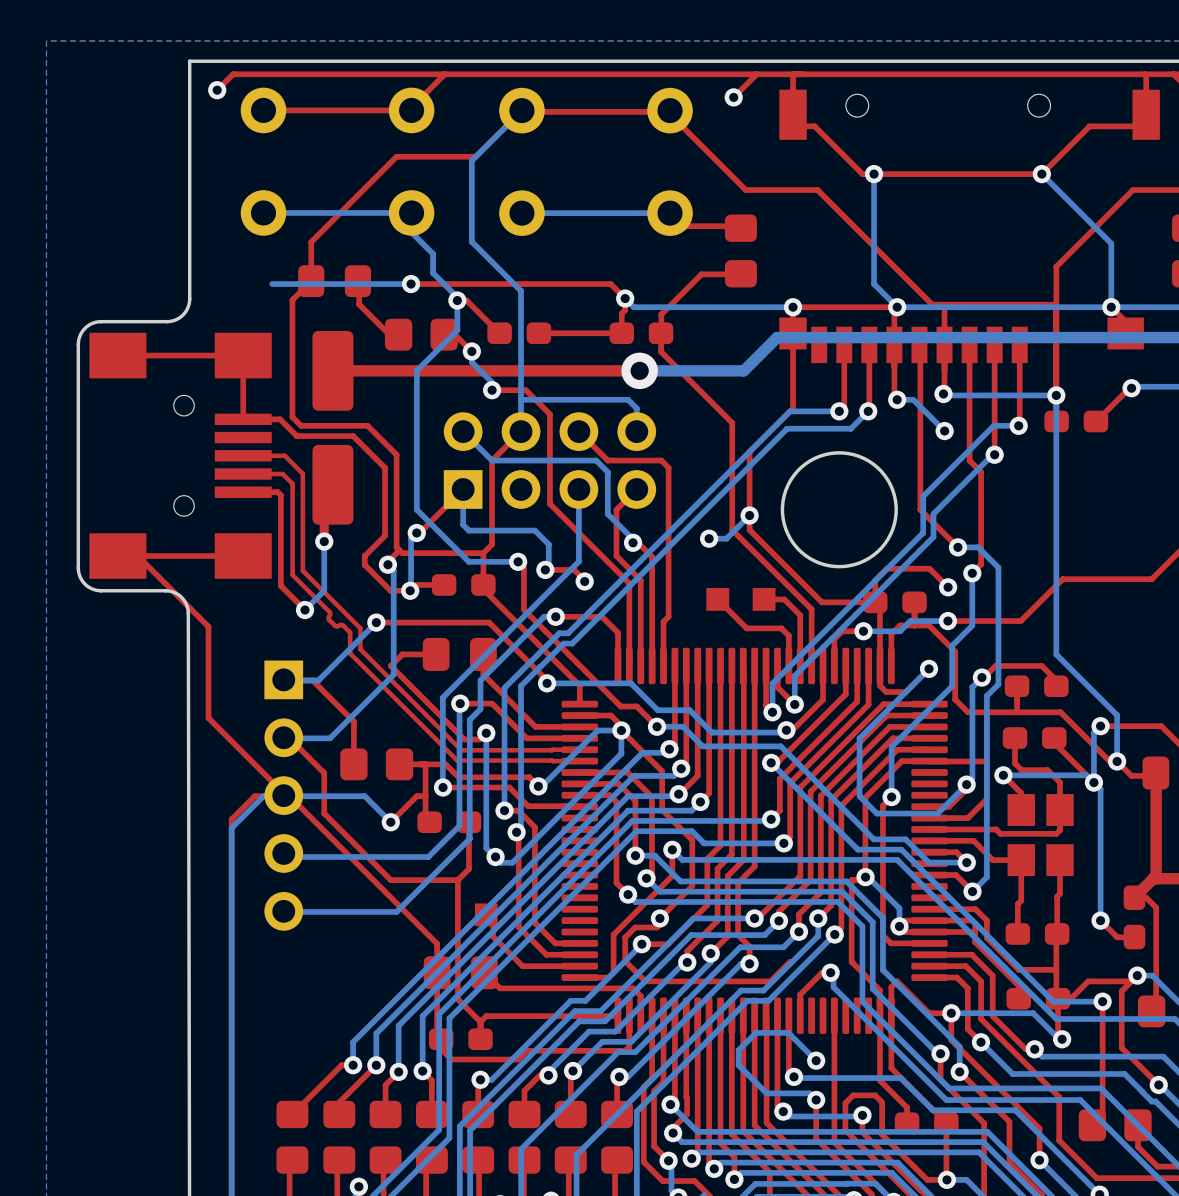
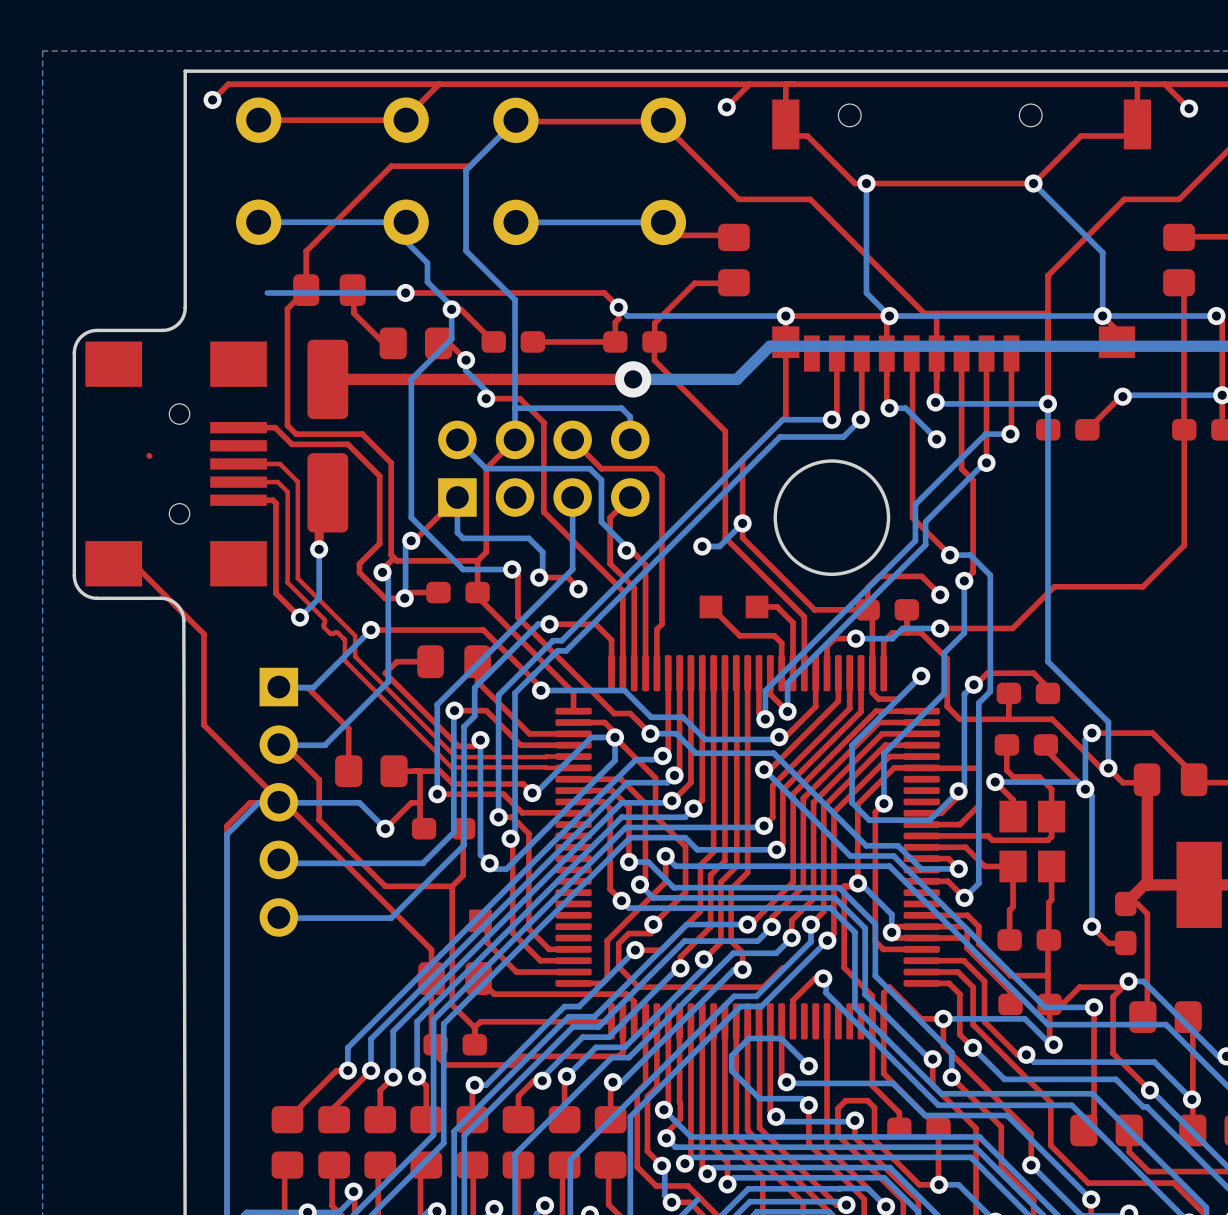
top track: (117, 355) (243, 355) (243, 419) -> none
top track: none -> (149, 455) (149, 456)
top track: (243, 556) (117, 556) -> none

